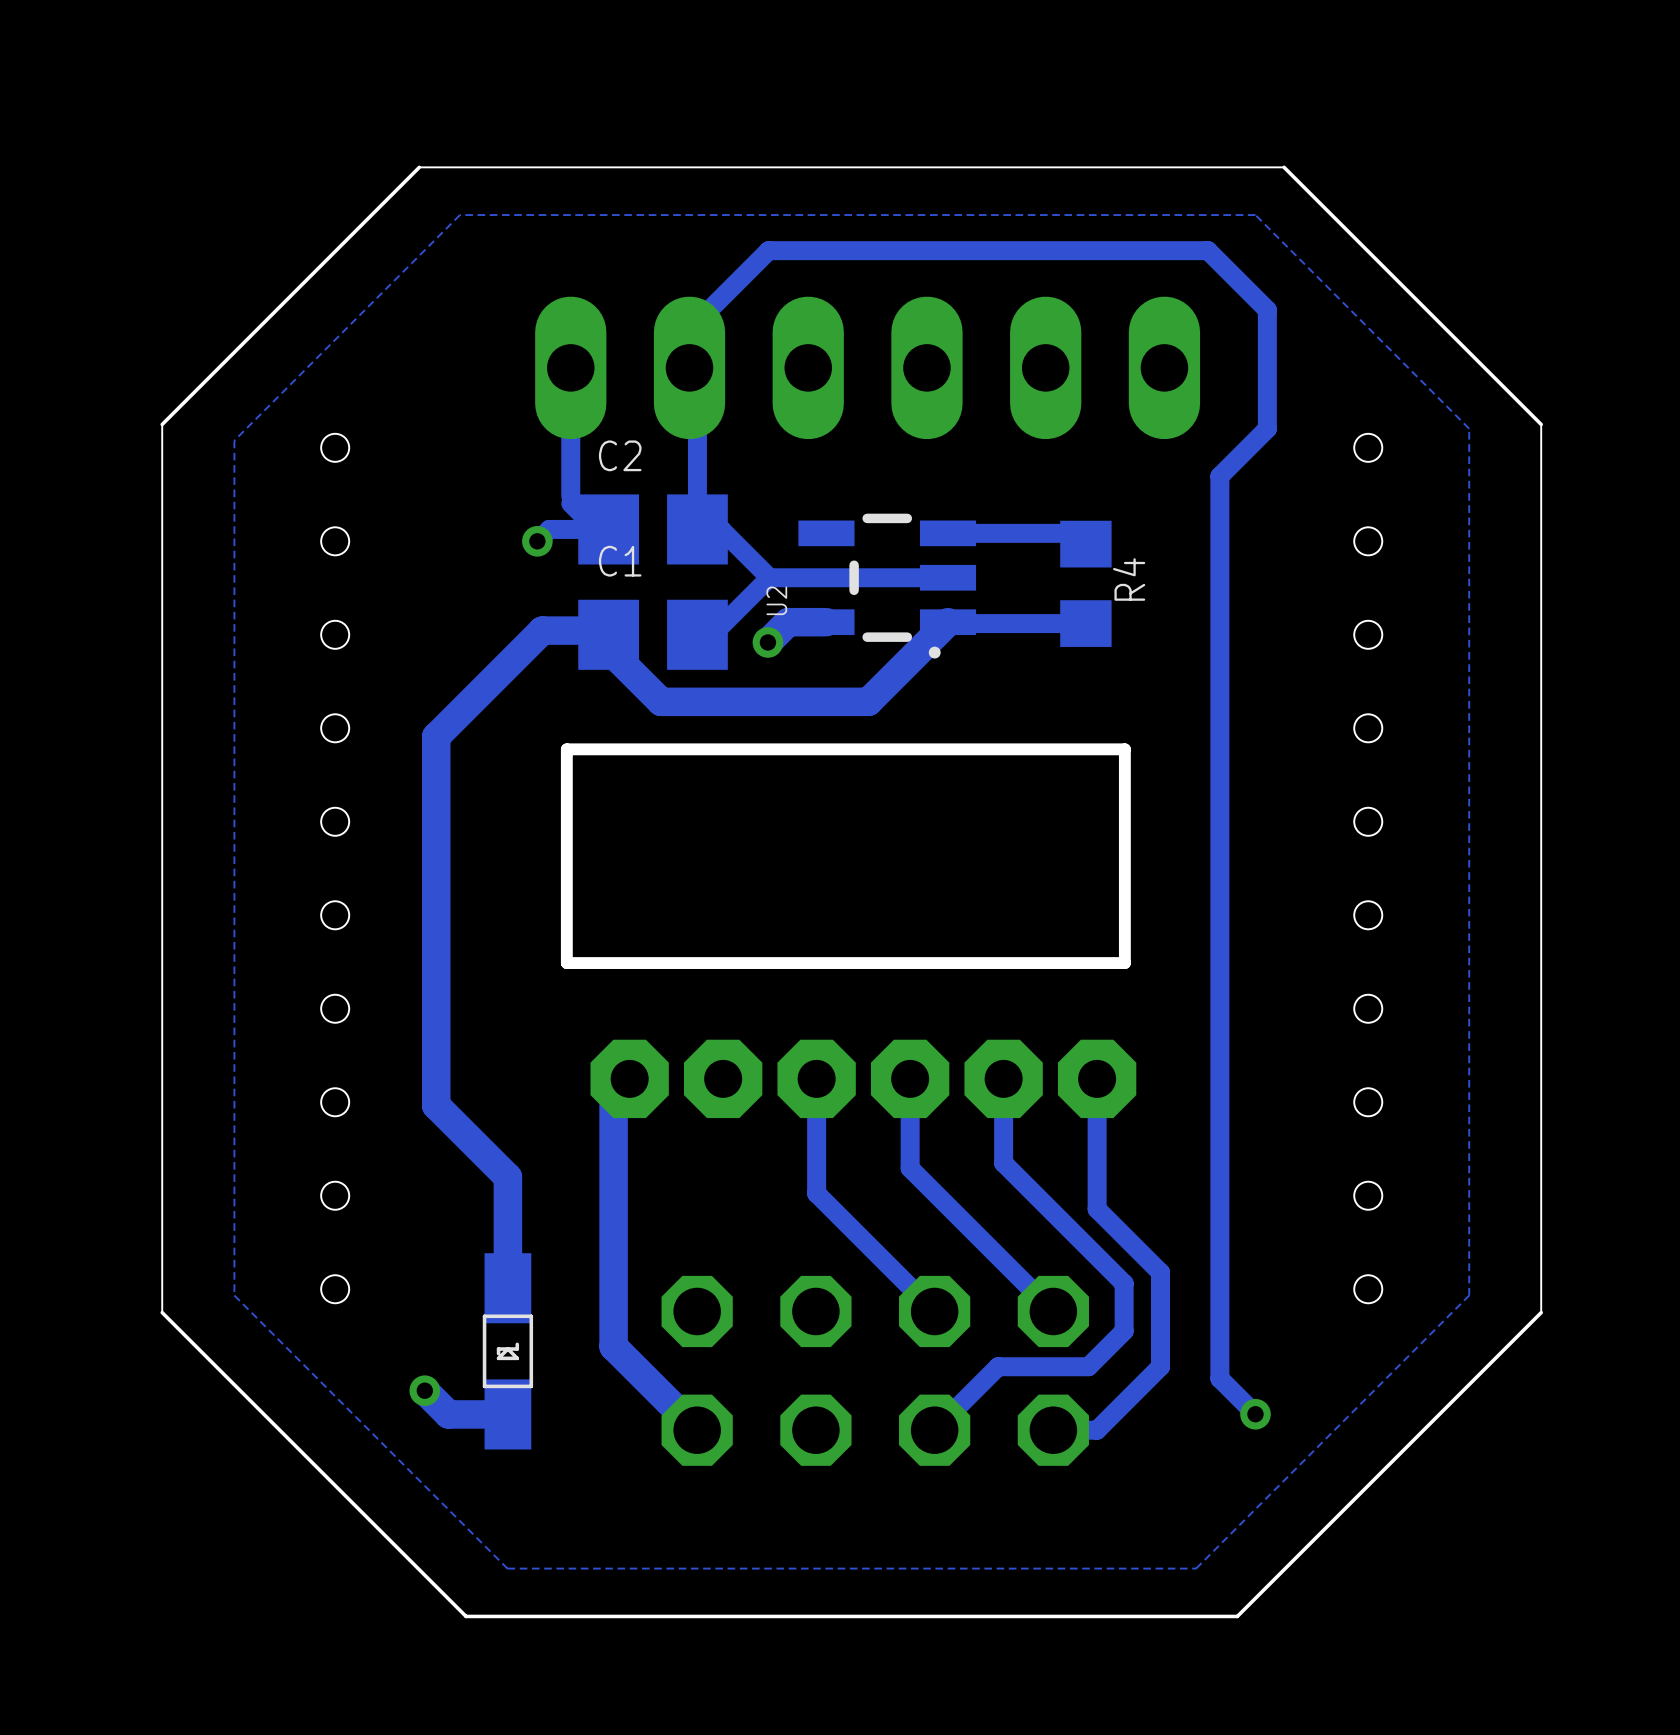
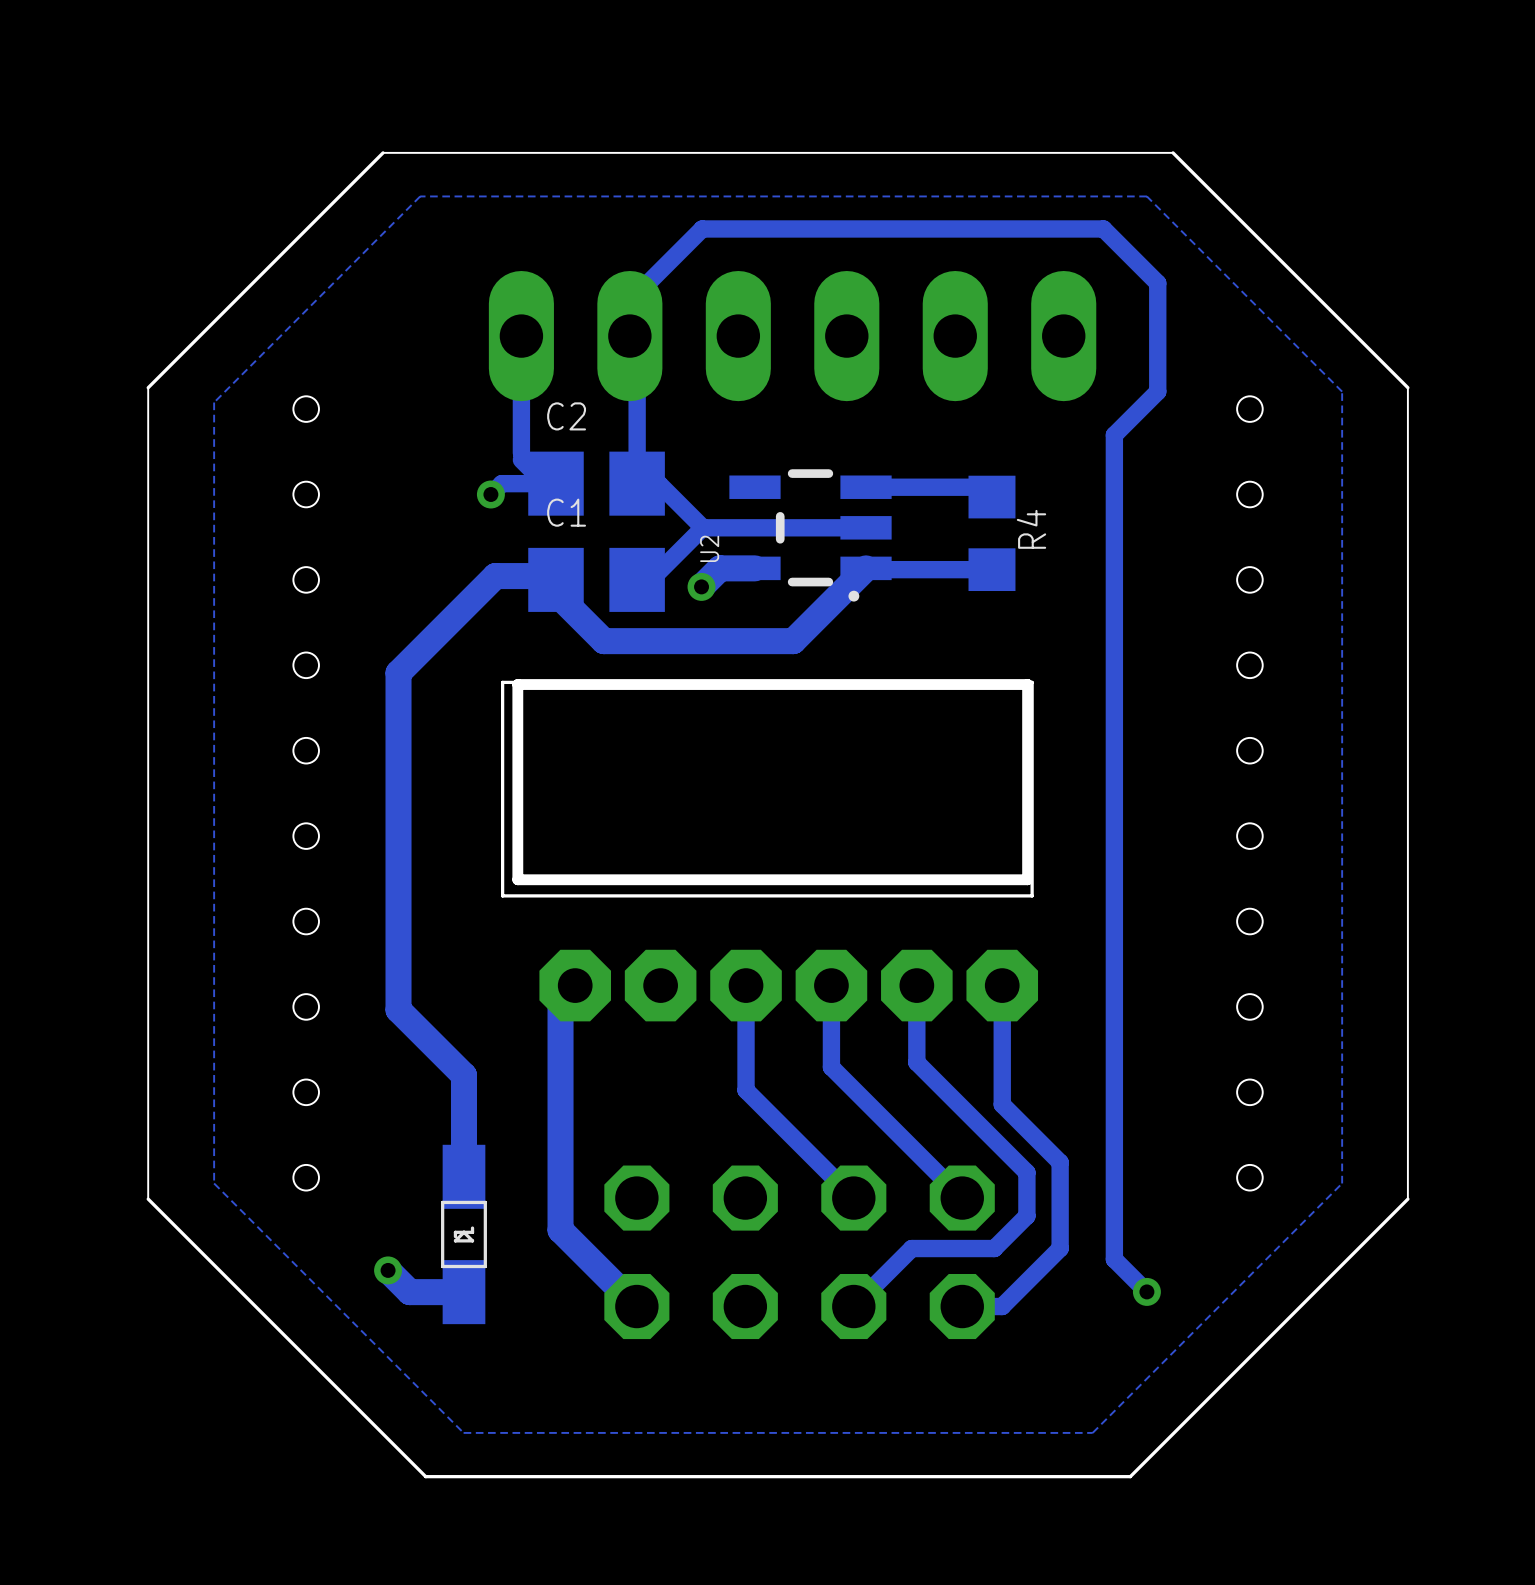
board edge: none -> (1032, 682) (502, 682) (502, 895) (1032, 895) (1032, 682)

